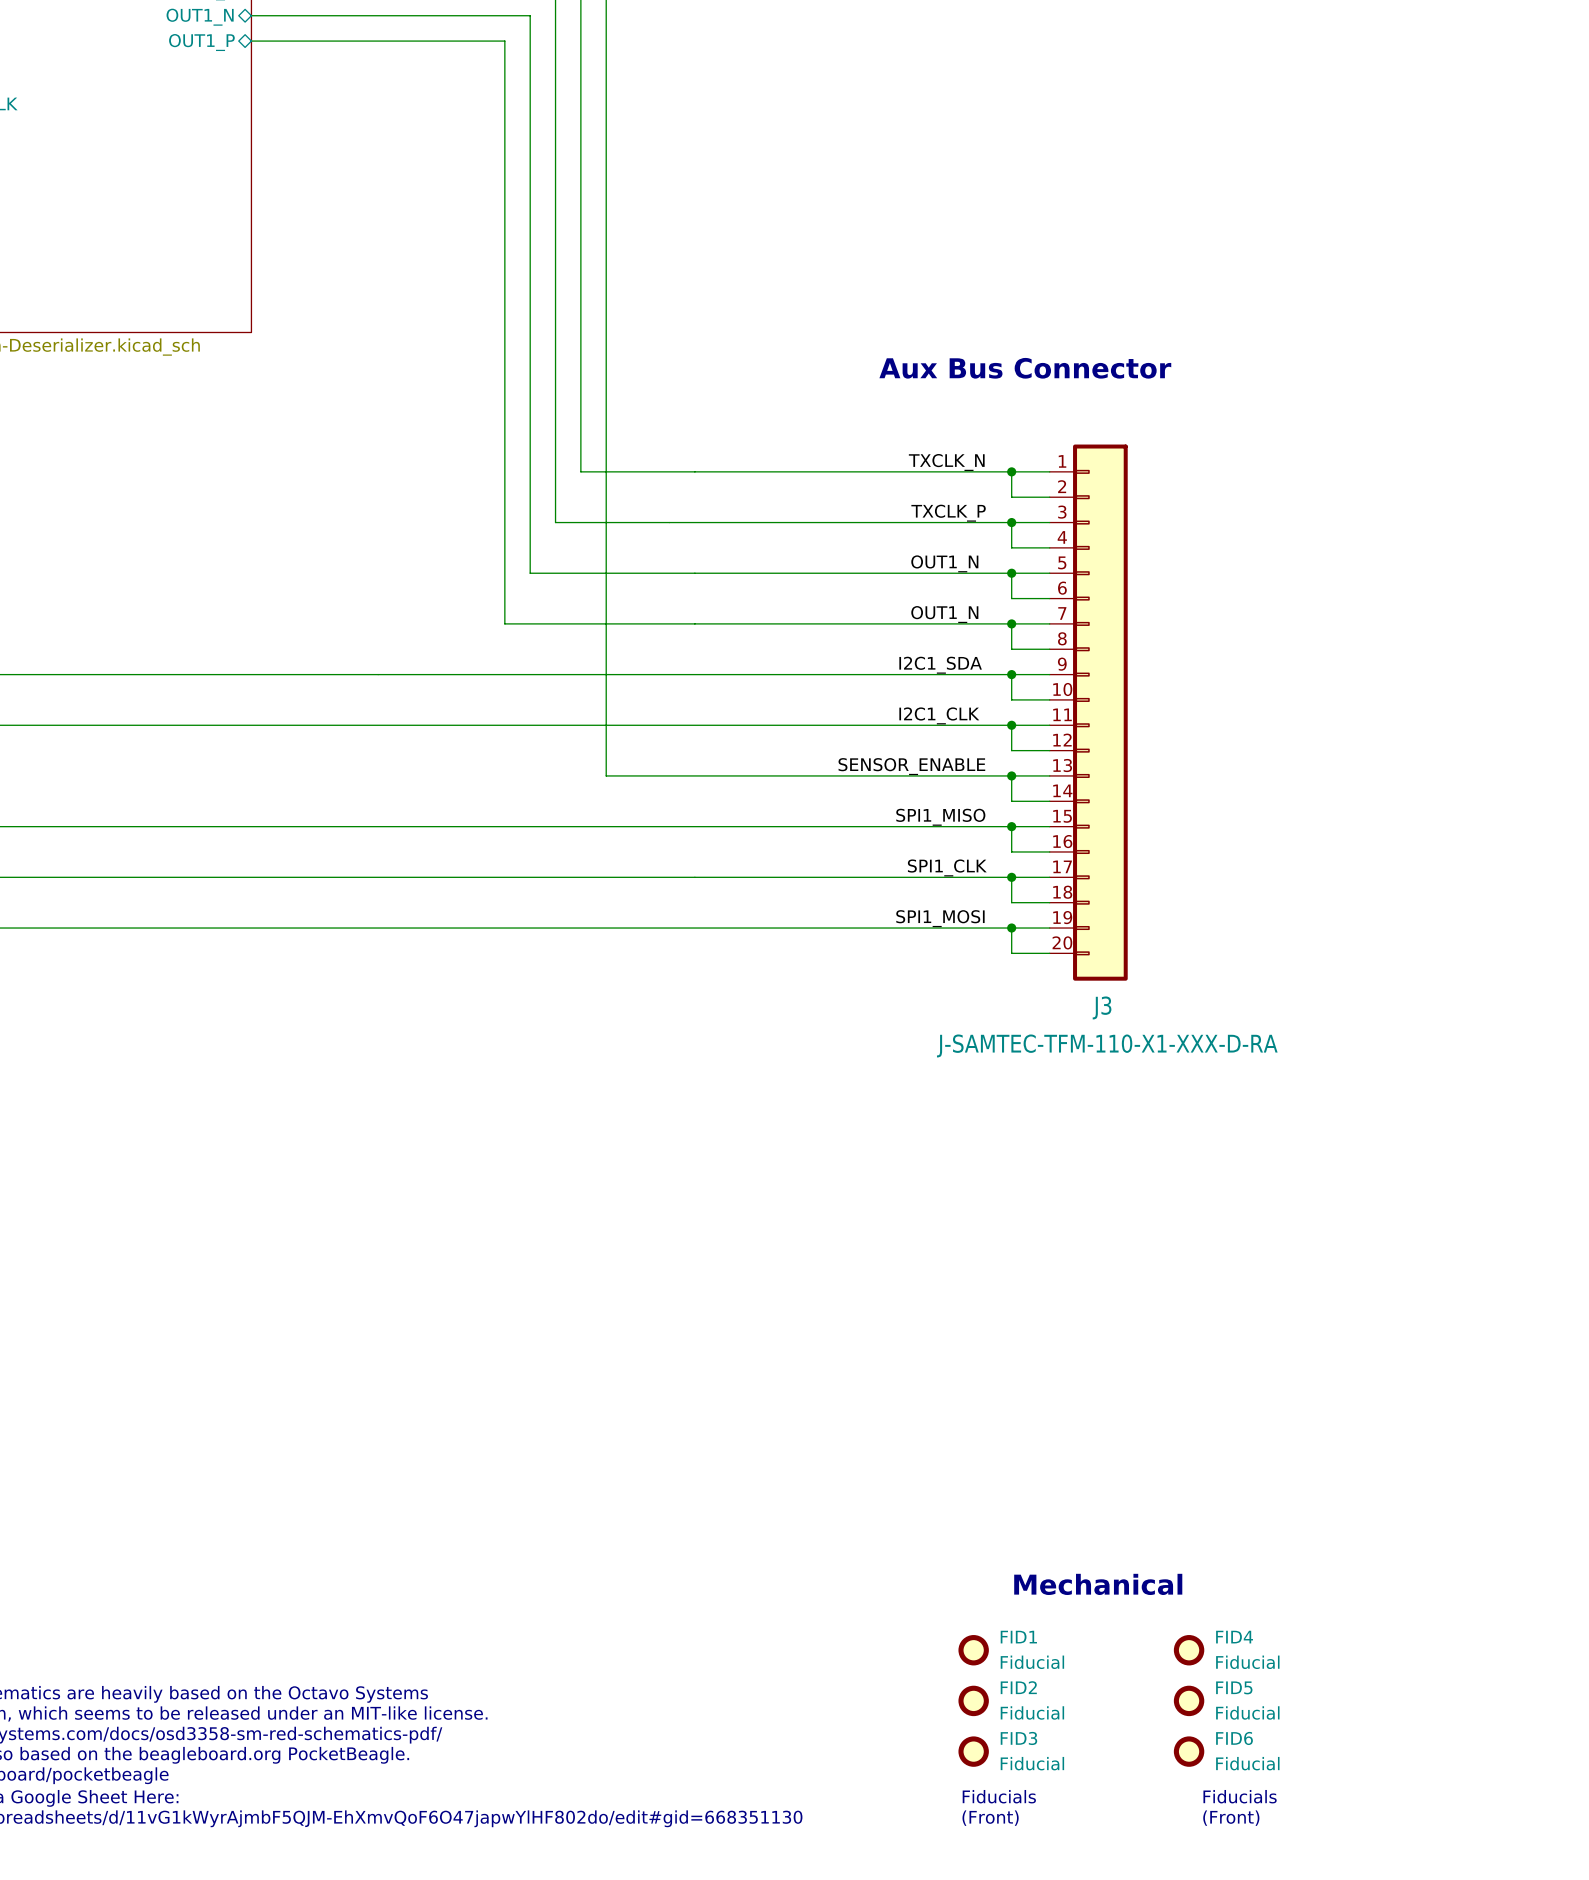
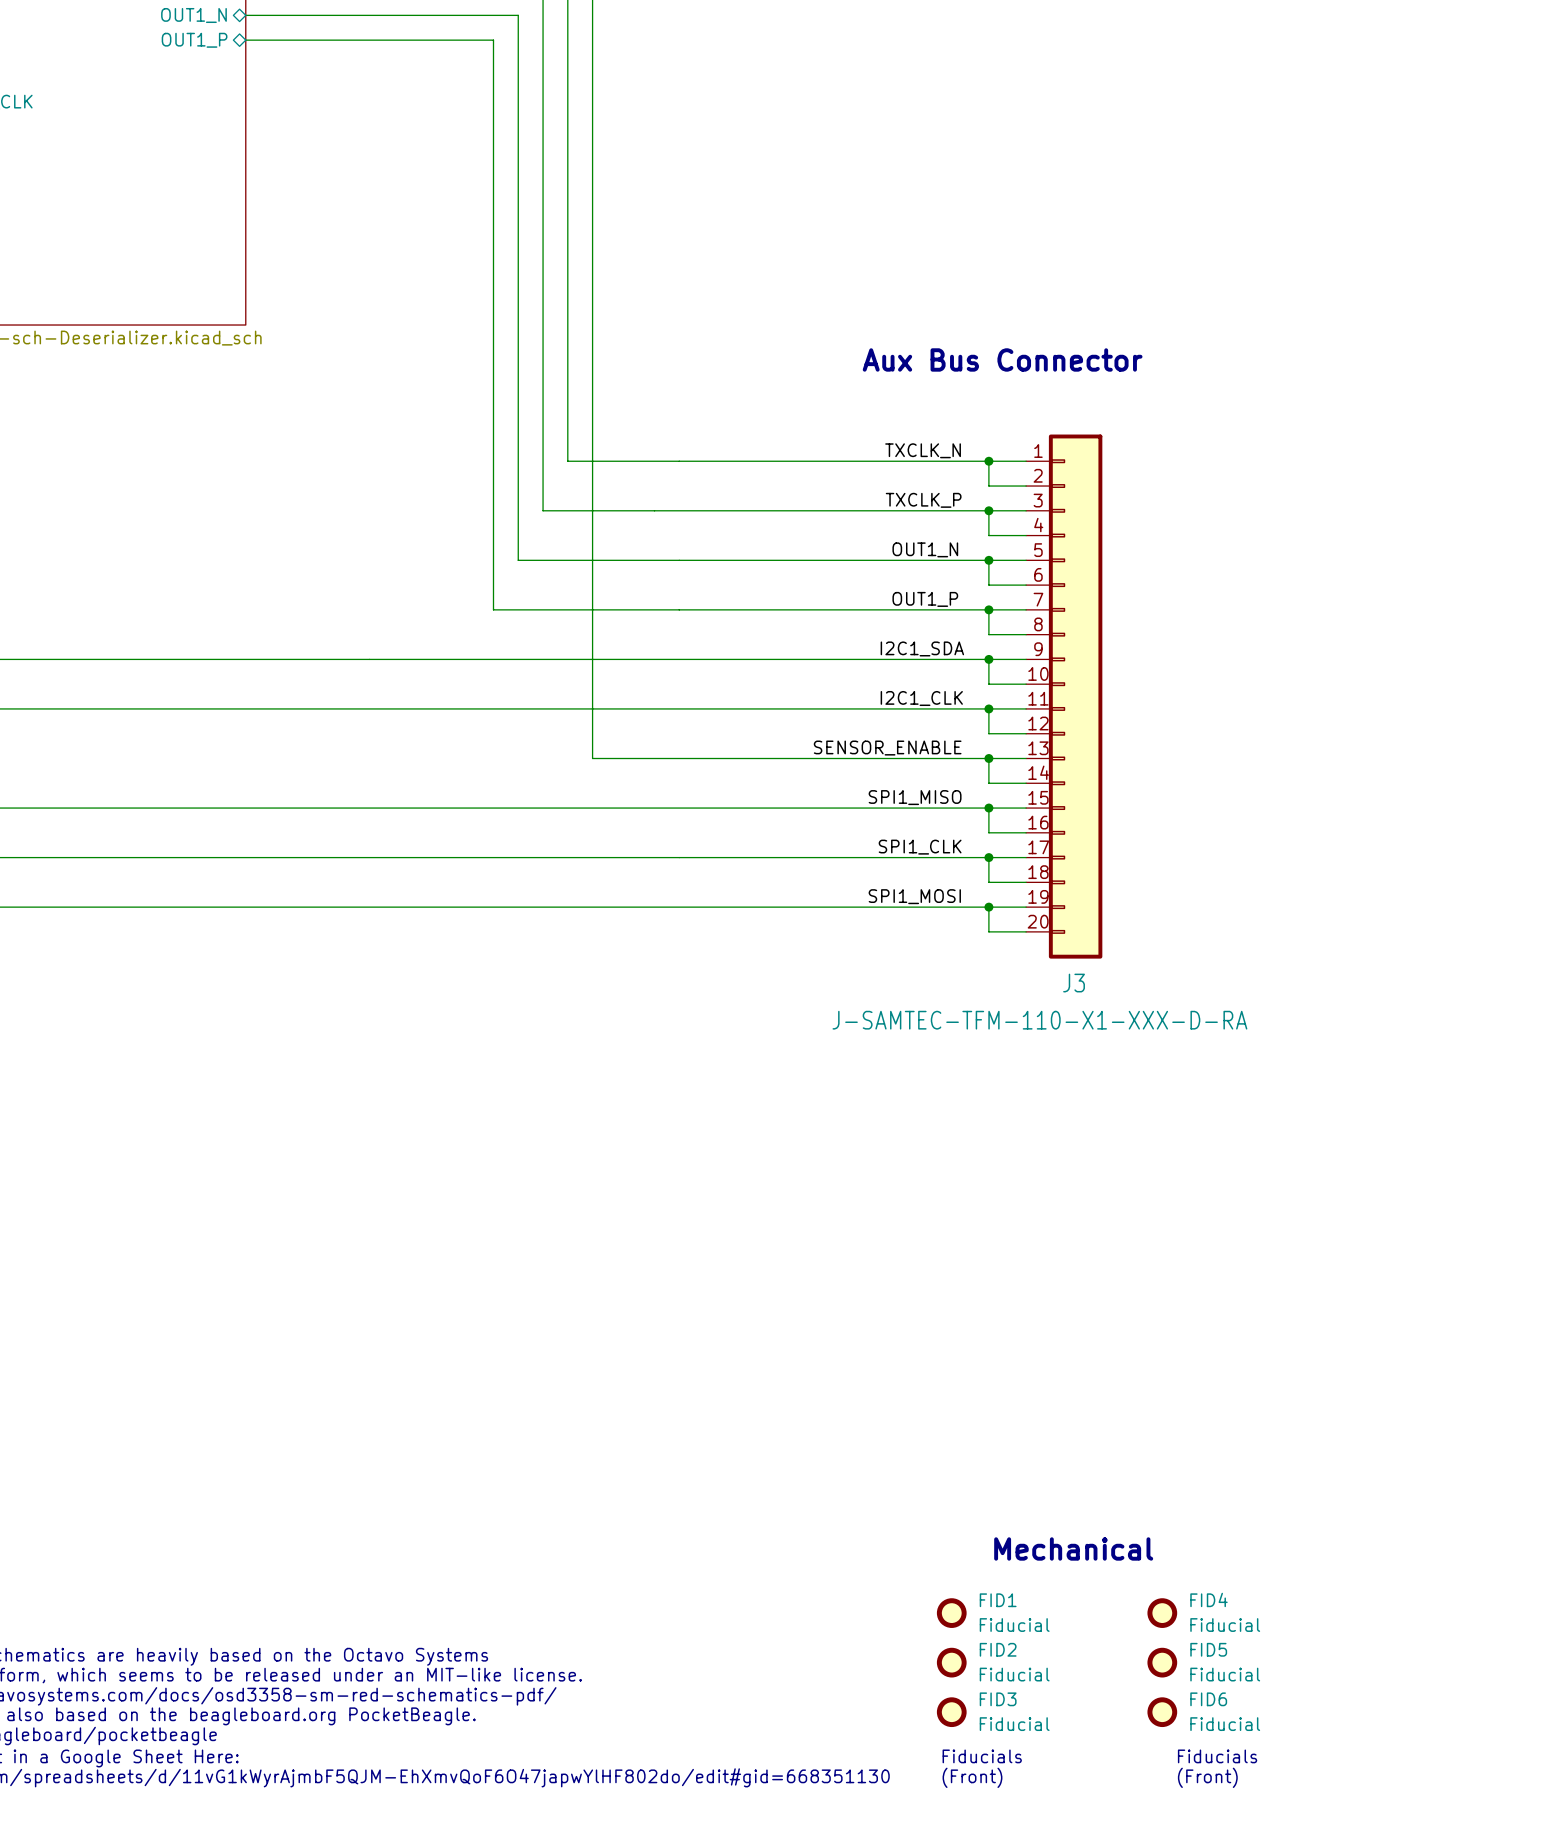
label: OUT1_N (944, 614) -> OUT1_P (925, 599)

